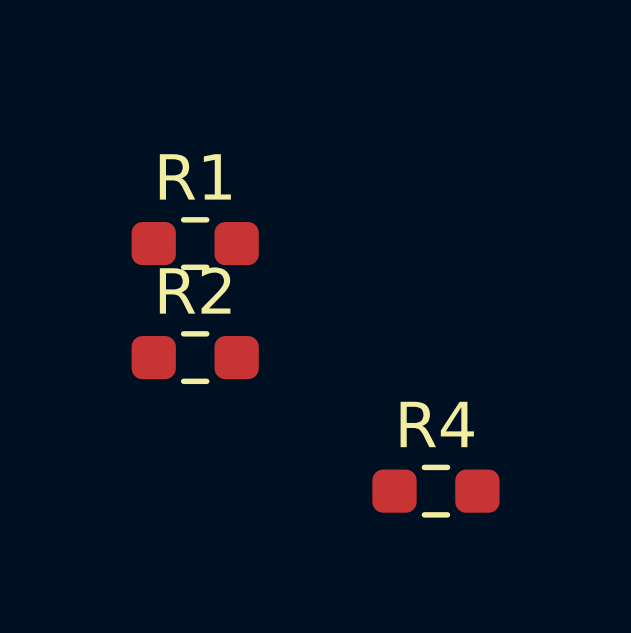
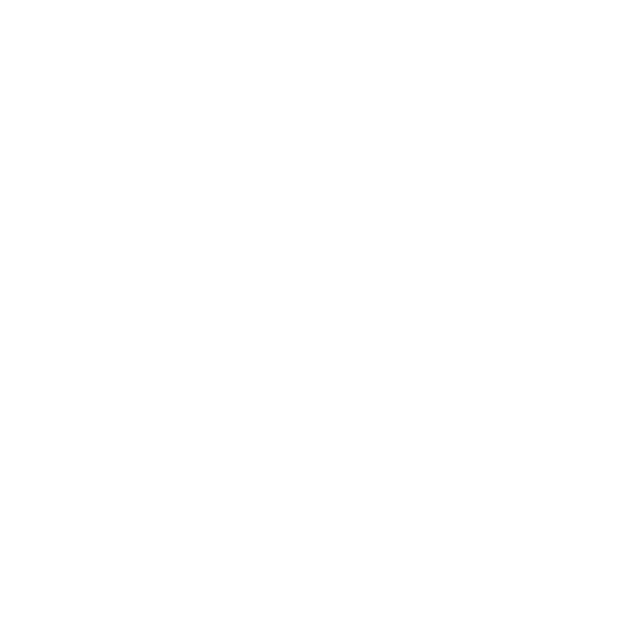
R1: (195, 243) -> none
R2: (195, 357) -> none
R4: (435, 491) -> none

